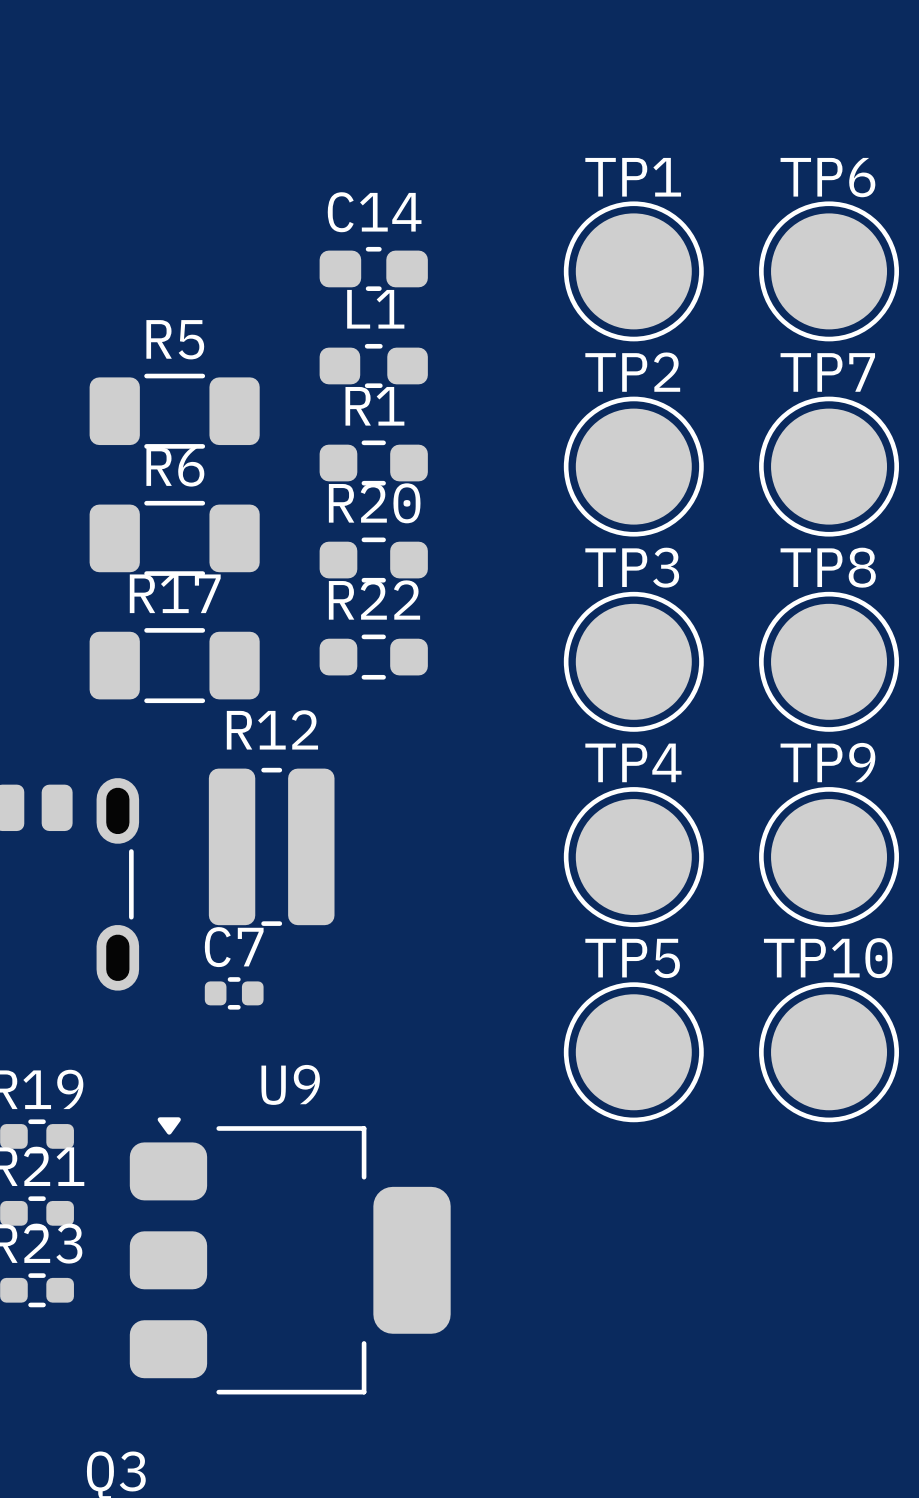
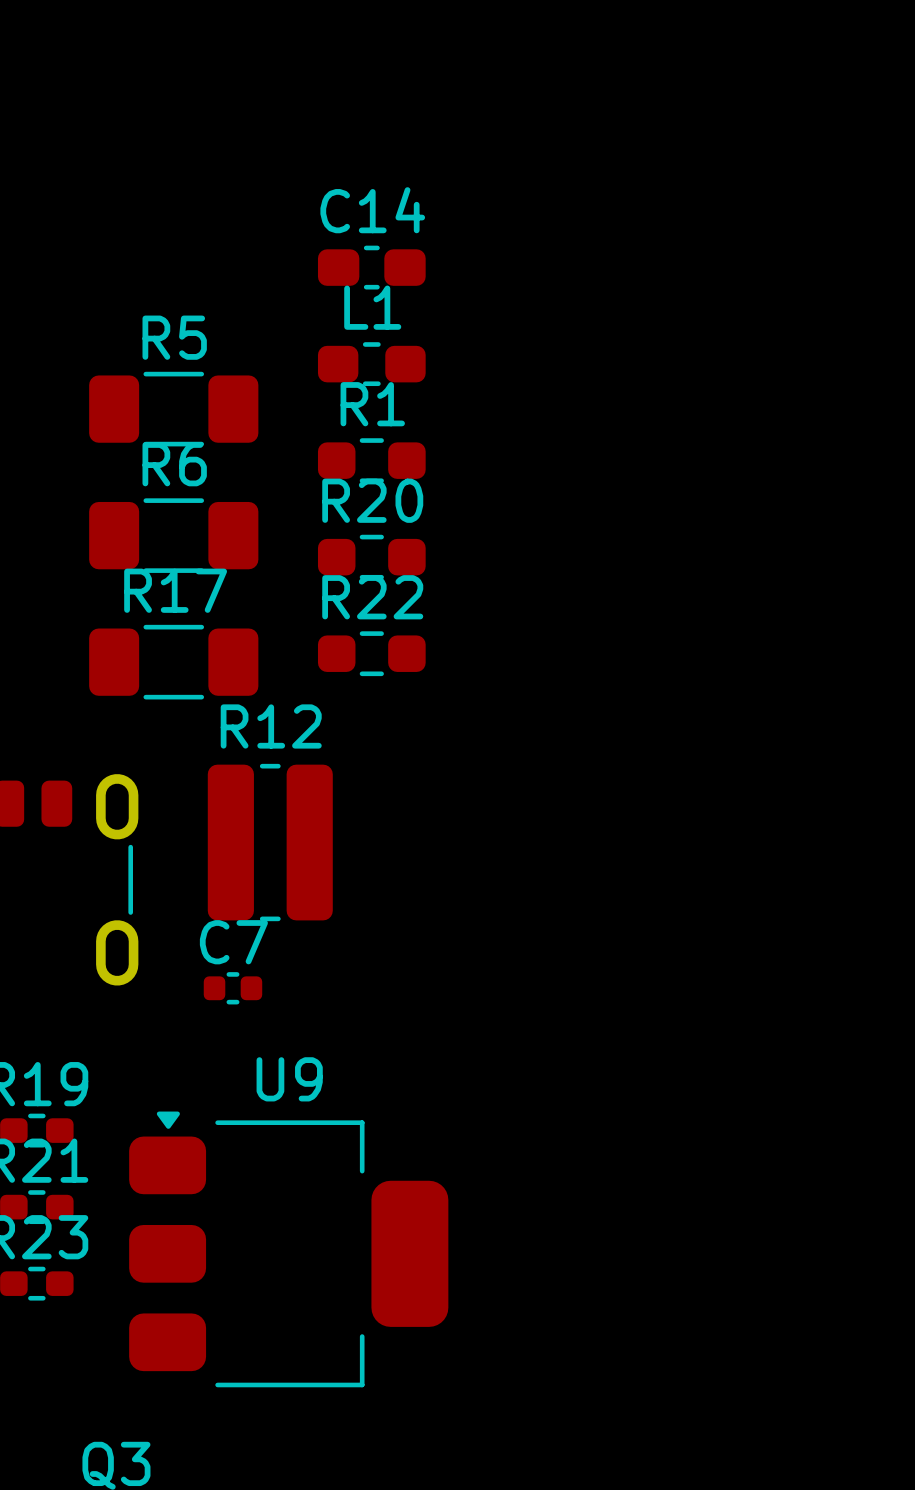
TP1: (633, 271) -> none
TP6: (829, 271) -> none
TP2: (633, 466) -> none
TP7: (829, 466) -> none
TP3: (633, 661) -> none
TP8: (829, 661) -> none
TP4: (633, 857) -> none
TP9: (829, 857) -> none
TP5: (633, 1052) -> none
TP10: (829, 1052) -> none

